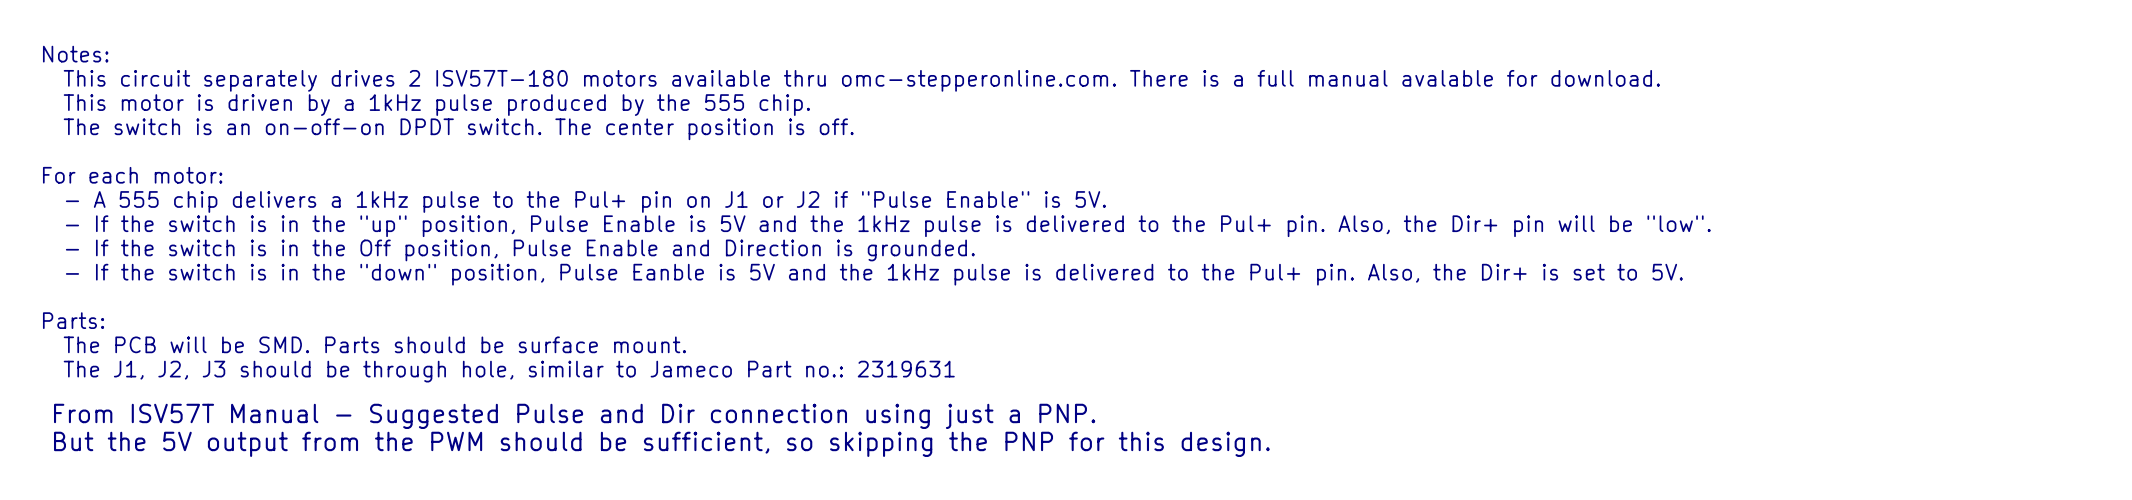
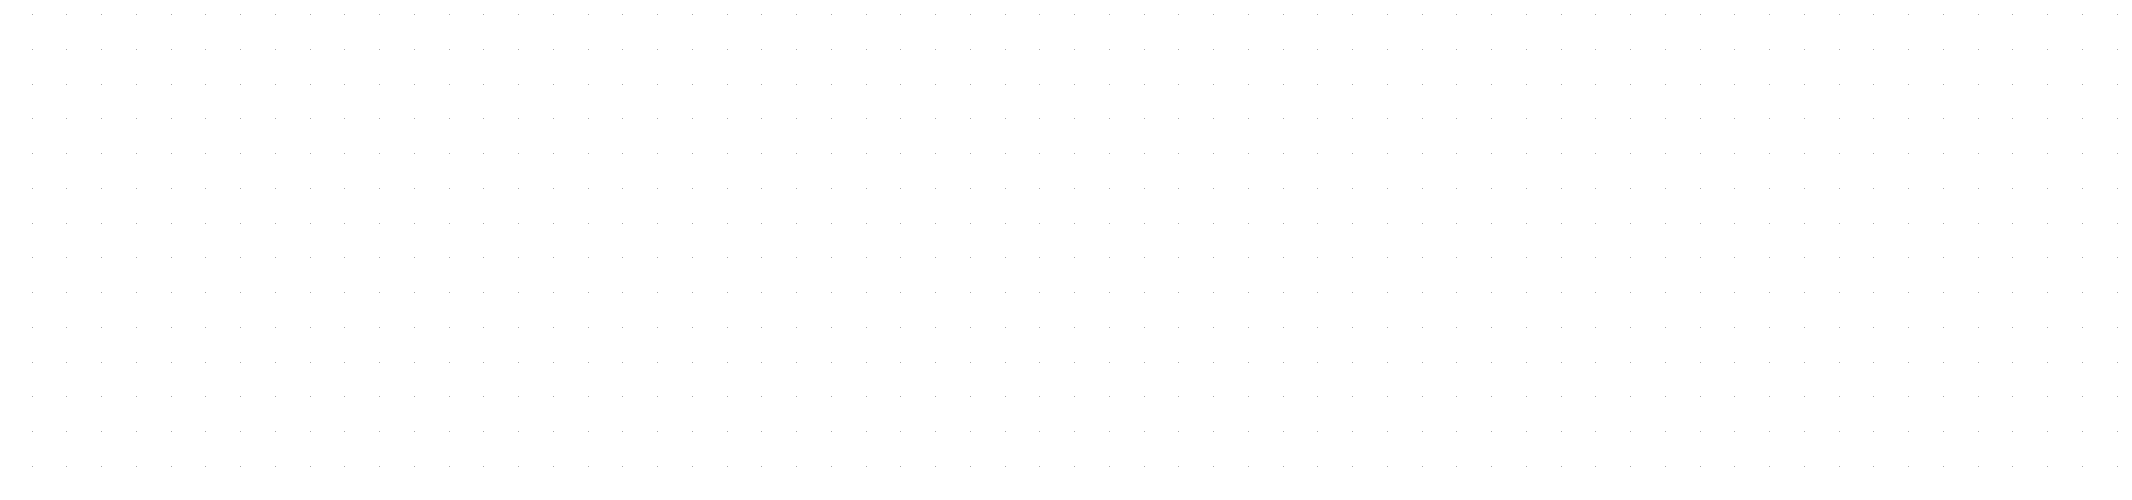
text: Notes: (75, 54) -> none
text: This circuit separately drives 2 ISV57T-180 motors available thru omc-stepperonline.com. There is a full manual avalable for download. (861, 80) -> none
text: This motor is driven by a 1kHz pulse produced by the 555 chip. (436, 105) -> none
text: The switch is an on-off-on DPDT switch. The center position is off. (458, 129) -> none
text: For each motor: (132, 175) -> none
text: - A 555 chip delivers a 1kHz pulse to the Pul+ pin on J1 or J2 if "Pulse Enable" is 5V. (585, 201) -> none
text: - If the switch is in the "up" position, Pulse Enable is 5V and the 1kHz pulse is delivered to the Pul+ pin. Also, the Dir+ pin will be "low". (888, 226) -> none
text: - If the switch is in the Off position, Pulse Enable and Direction is grounded. (520, 250) -> none
text: - If the switch is in the "down" position, Pulse Eanble is 5V and the 1kHz pulse is delivered to the Pul+ pin. Also, the Dir+ is set to 5V. (874, 274) -> none
text: Parts: (73, 320) -> none
text: The PCB will be SMD. Parts should be surface mount. (374, 344) -> none
text: The J1, J2, J3 should be through hole, similar to Jameco Part no.: 2319631 (509, 371) -> none
text: From ISV57T Manual - Suggested Pulse and Dir connection using just a PNP. (574, 416) -> none
text: But the 5V output from the PWM should be sufficient, so skipping the PNP for this design. (661, 444) -> none

